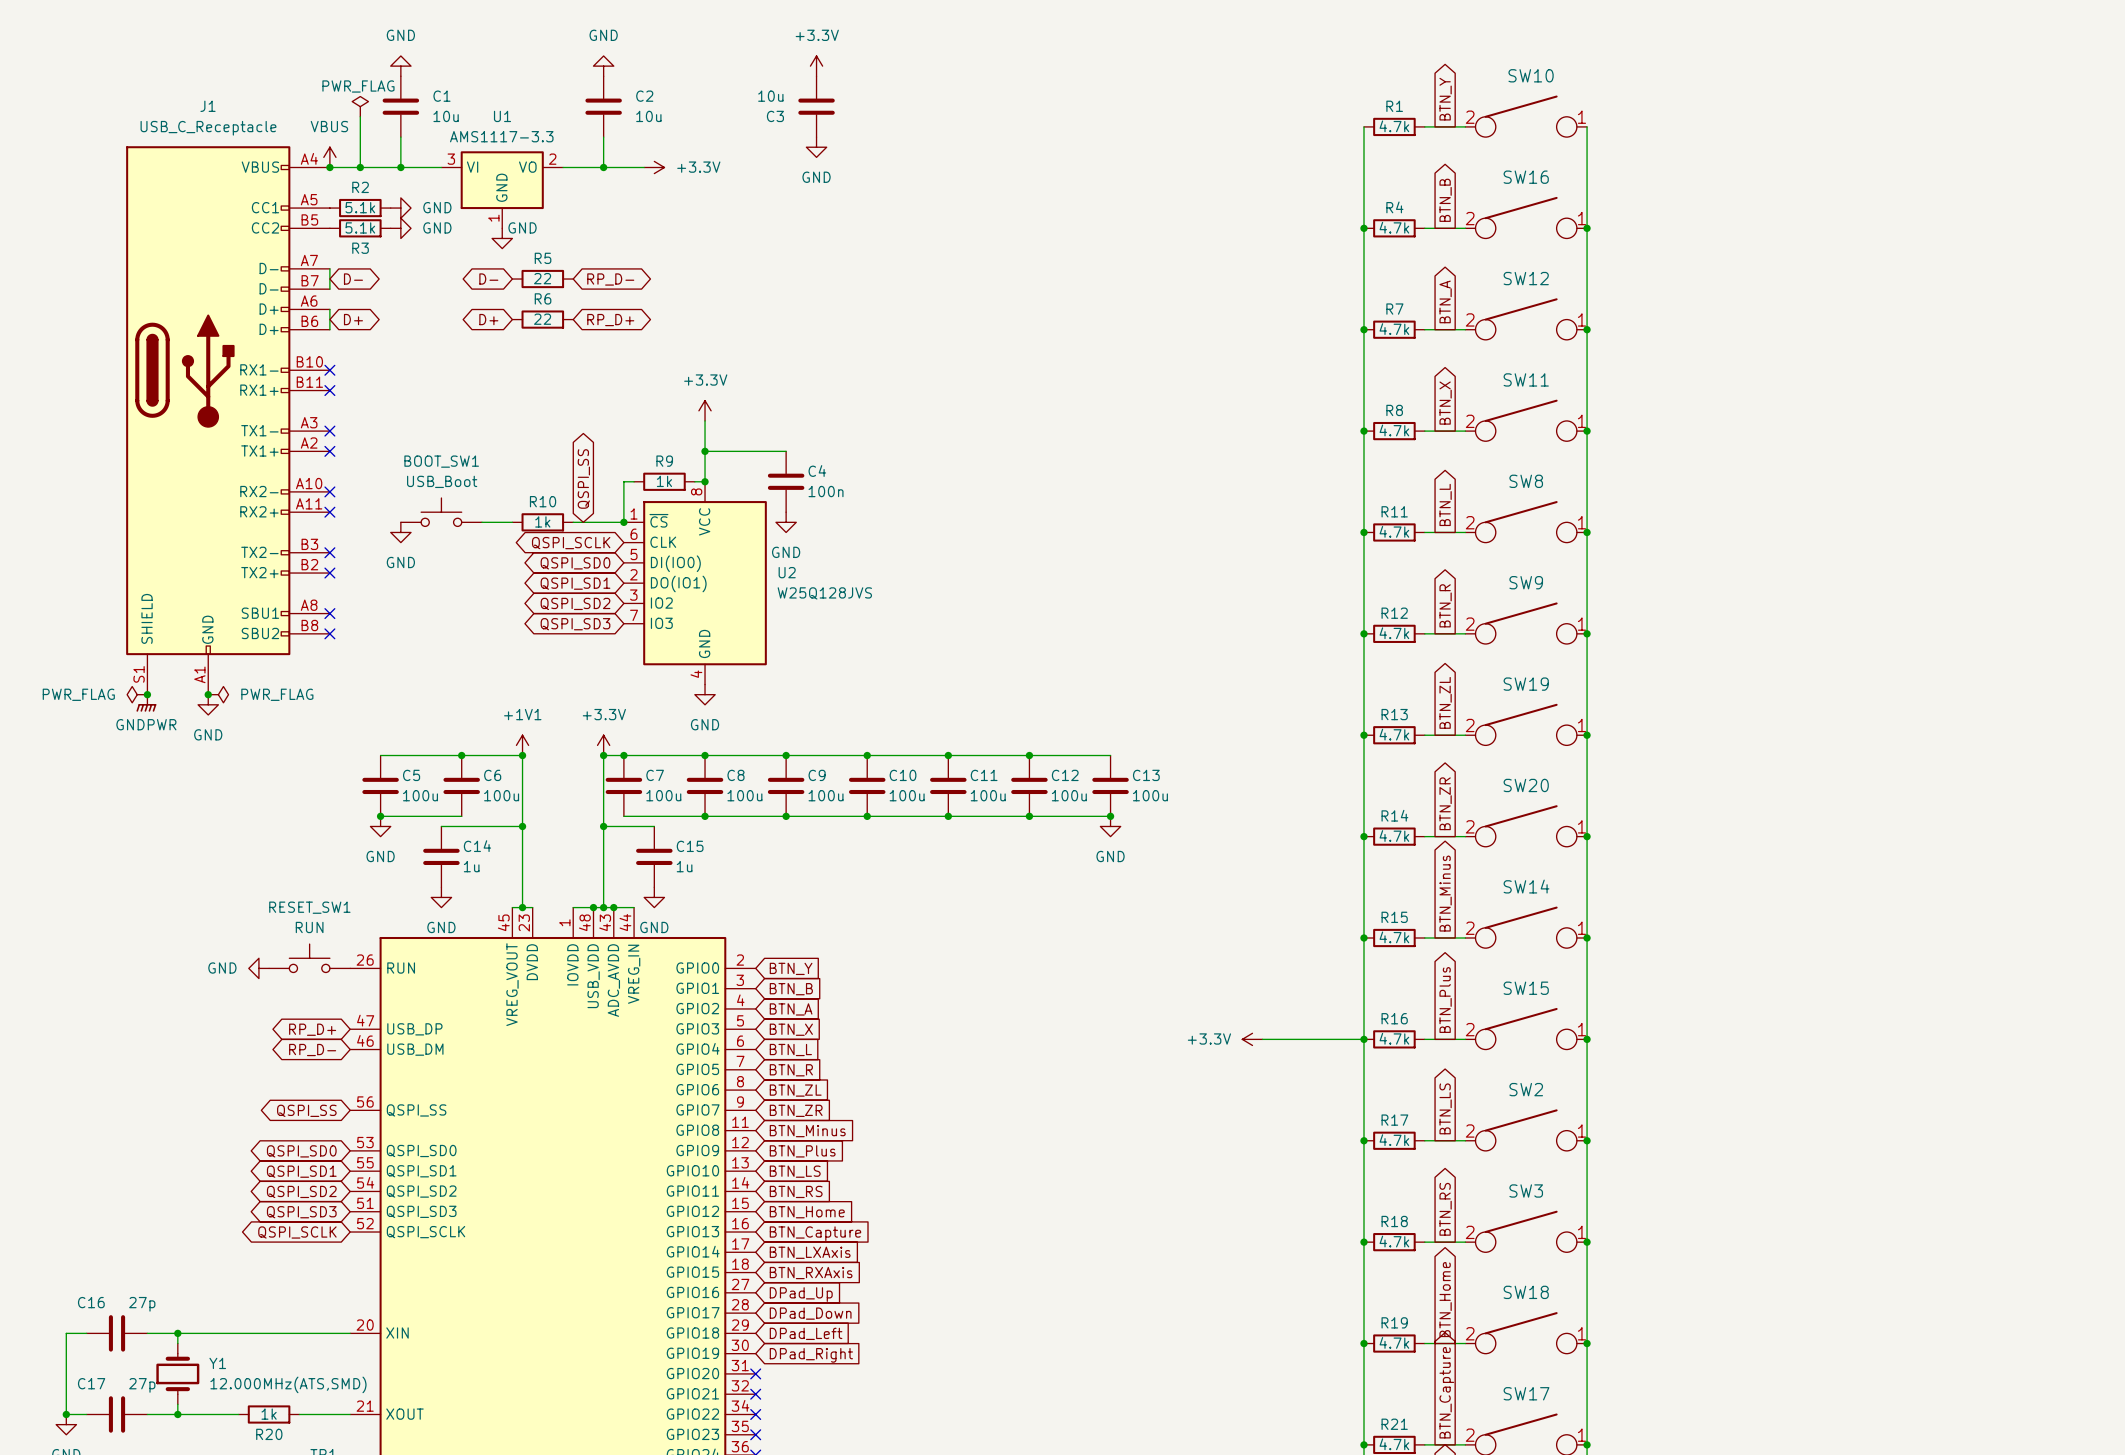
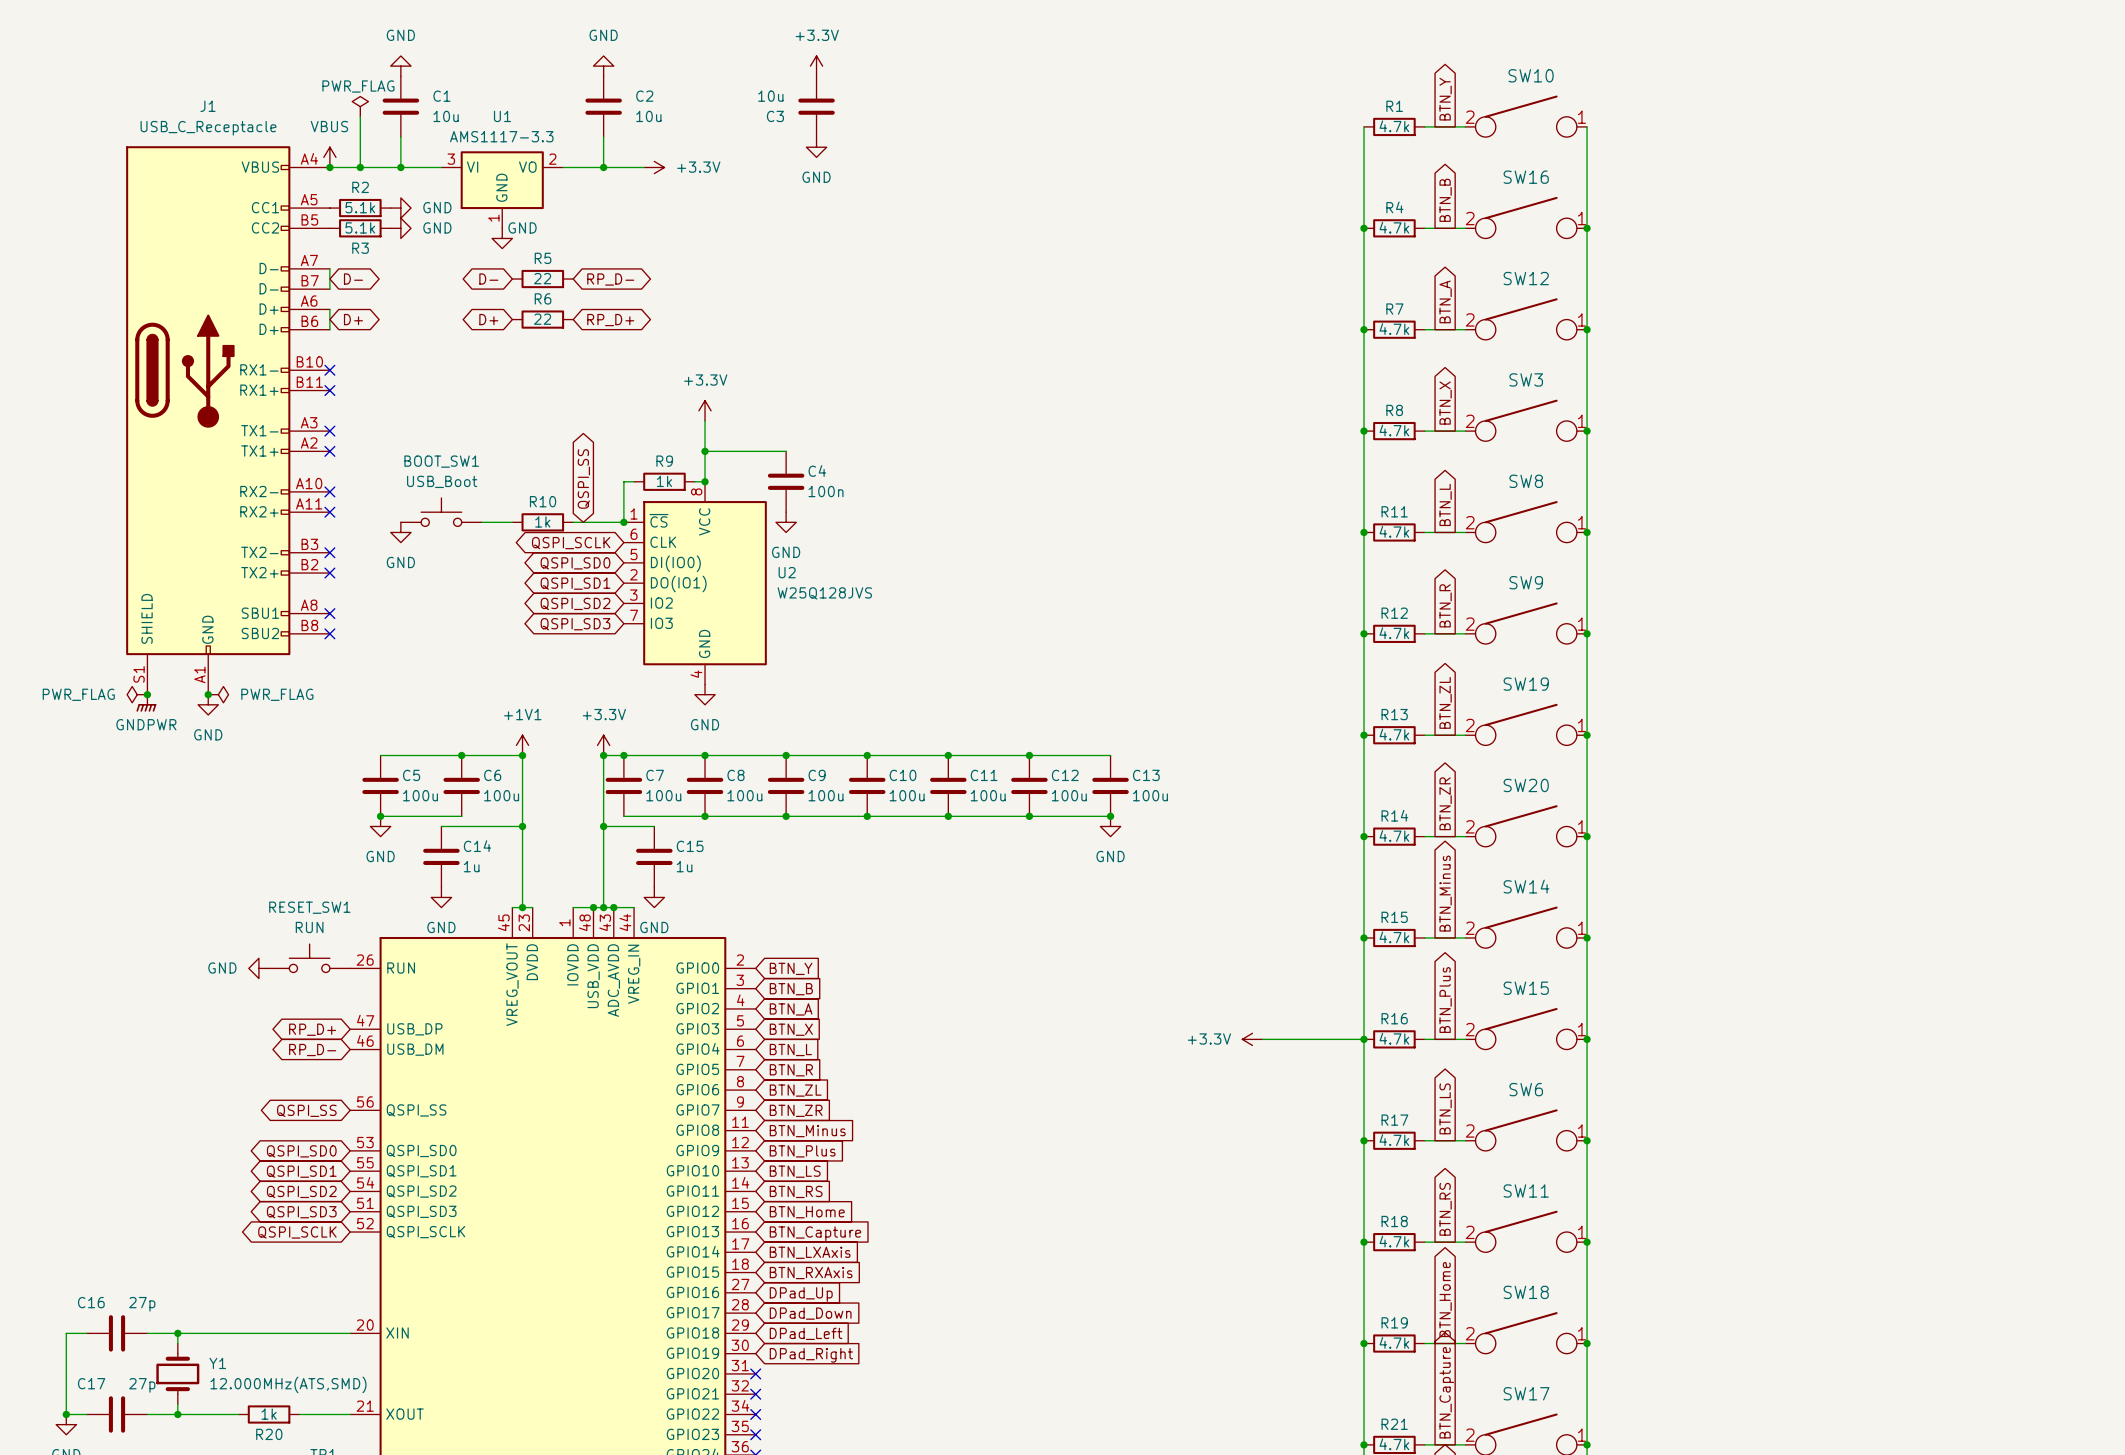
SW11 name: SW11 (1526, 379) -> SW3 (1526, 379)
SW2 name: SW2 (1526, 1089) -> SW6 (1526, 1089)
SW3 name: SW3 (1526, 1191) -> SW11 (1526, 1191)

